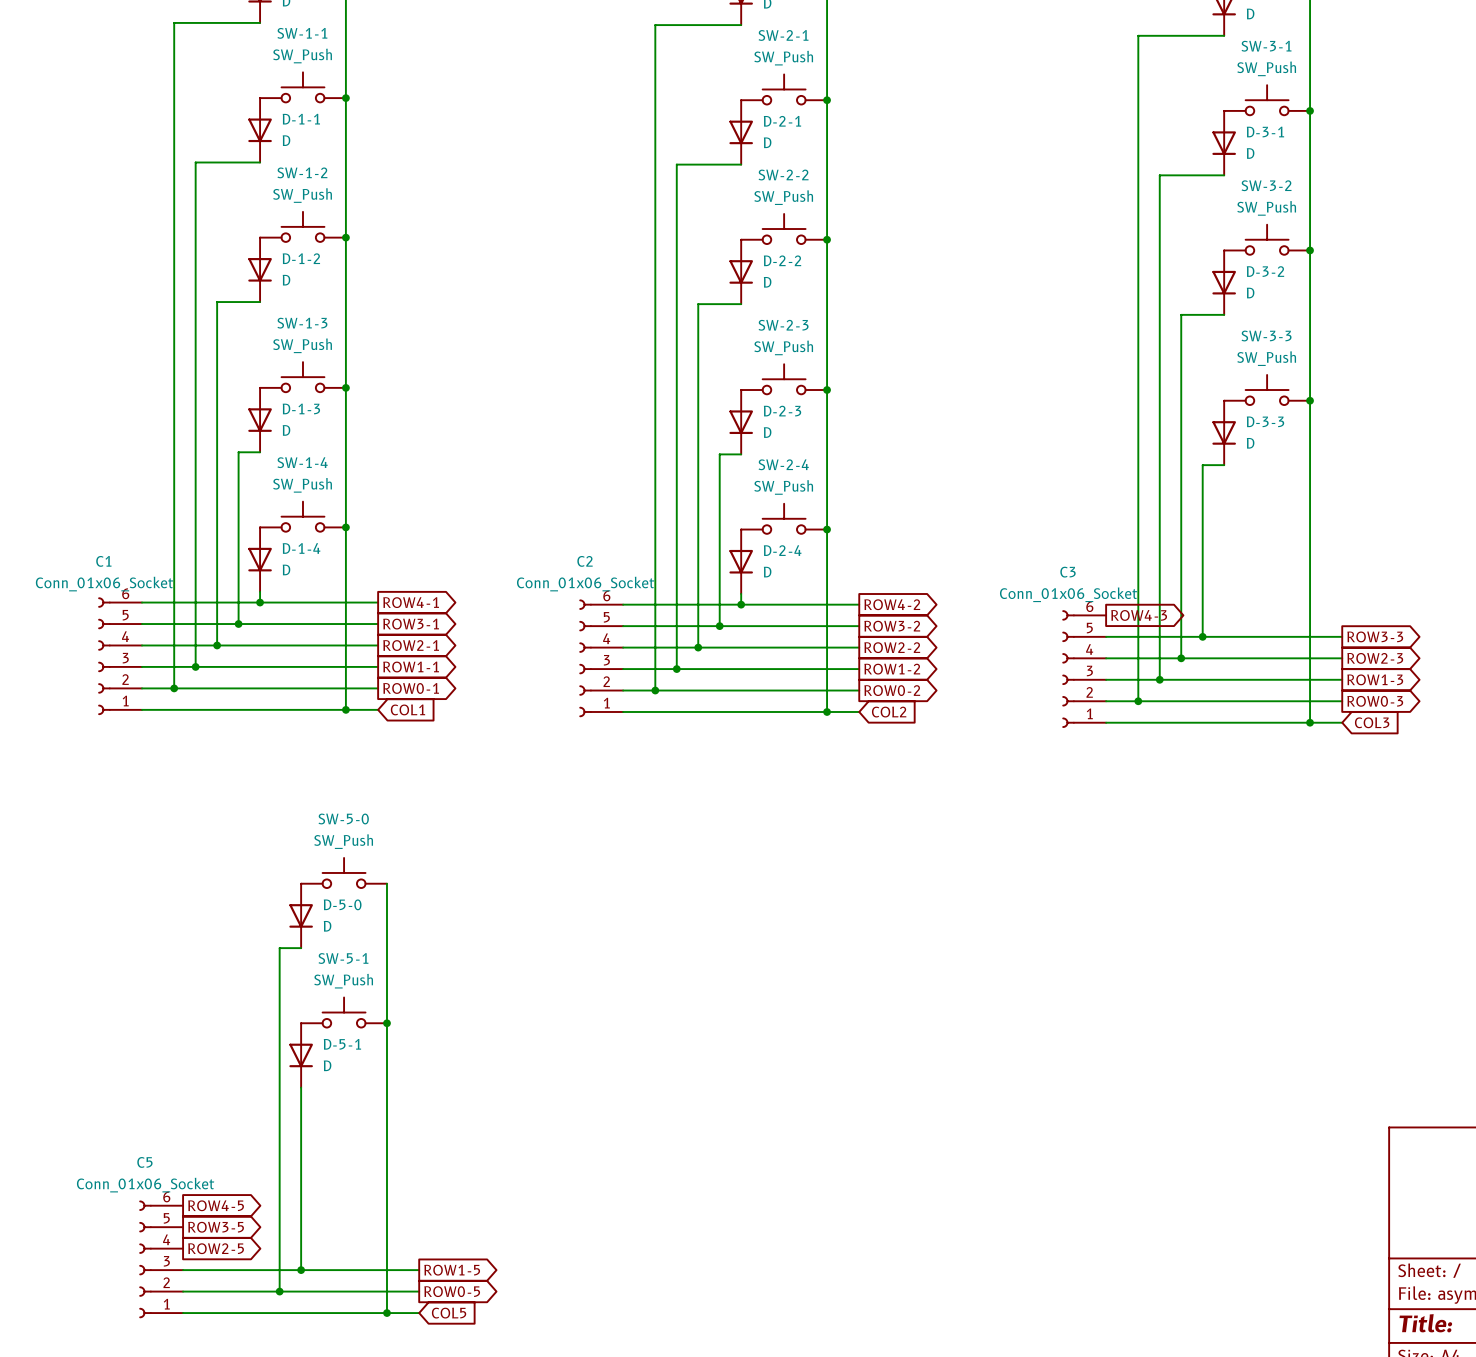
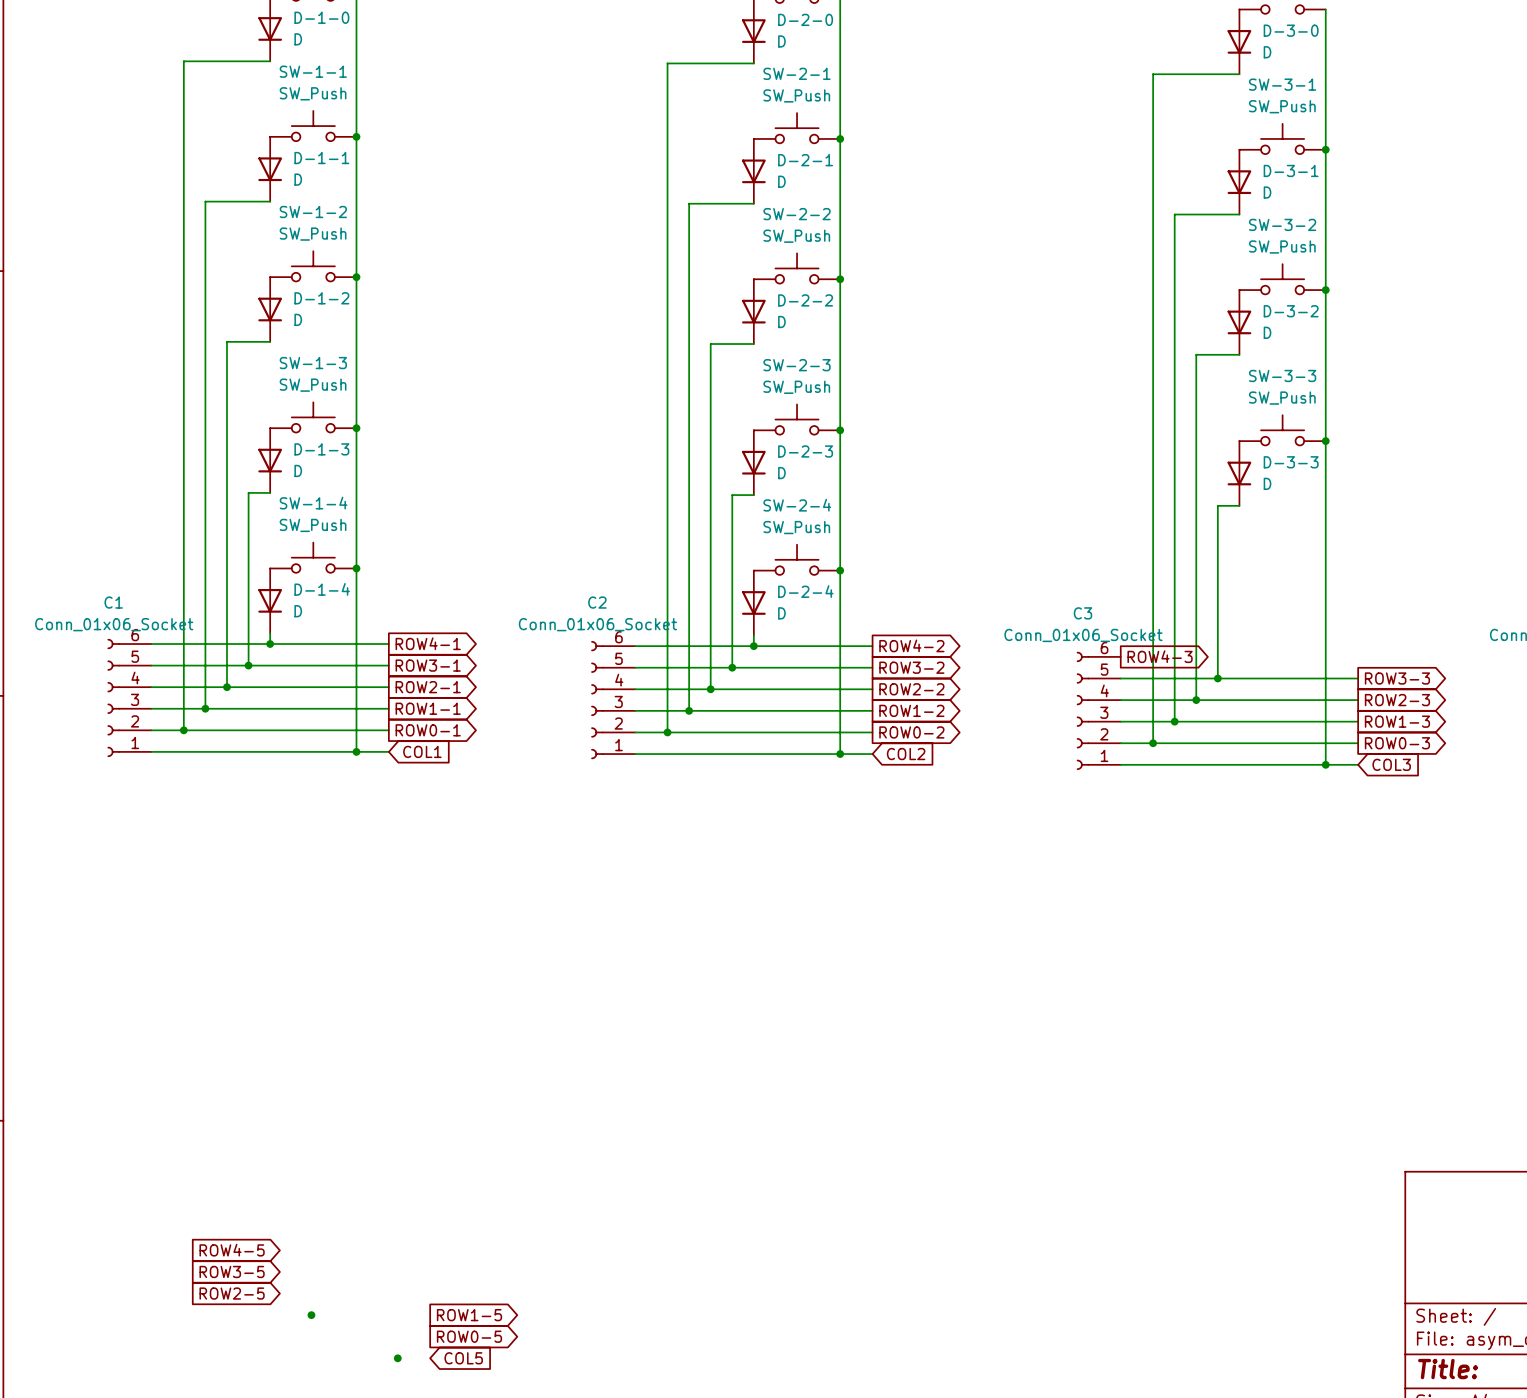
SW-5-0: SW_Push (344, 872) -> none
wire: (386, 883) (386, 1313) -> none
D-5-0: D (301, 915) -> none
wire: (301, 948) (279, 948) (279, 1291) -> none
SW-5-1: SW_Push (344, 1012) -> none
junction: (386, 1023) -> none
D-5-1: D (301, 1055) -> none
wire: (301, 1087) (301, 1270) -> none
C5: Conn_01x06_Socket (161, 1259) -> none
wire: (183, 1270) (419, 1270) -> none
wire: (183, 1291) (419, 1291) -> none
junction: (279, 1291) -> none
wire: (183, 1313) (419, 1313) -> none

